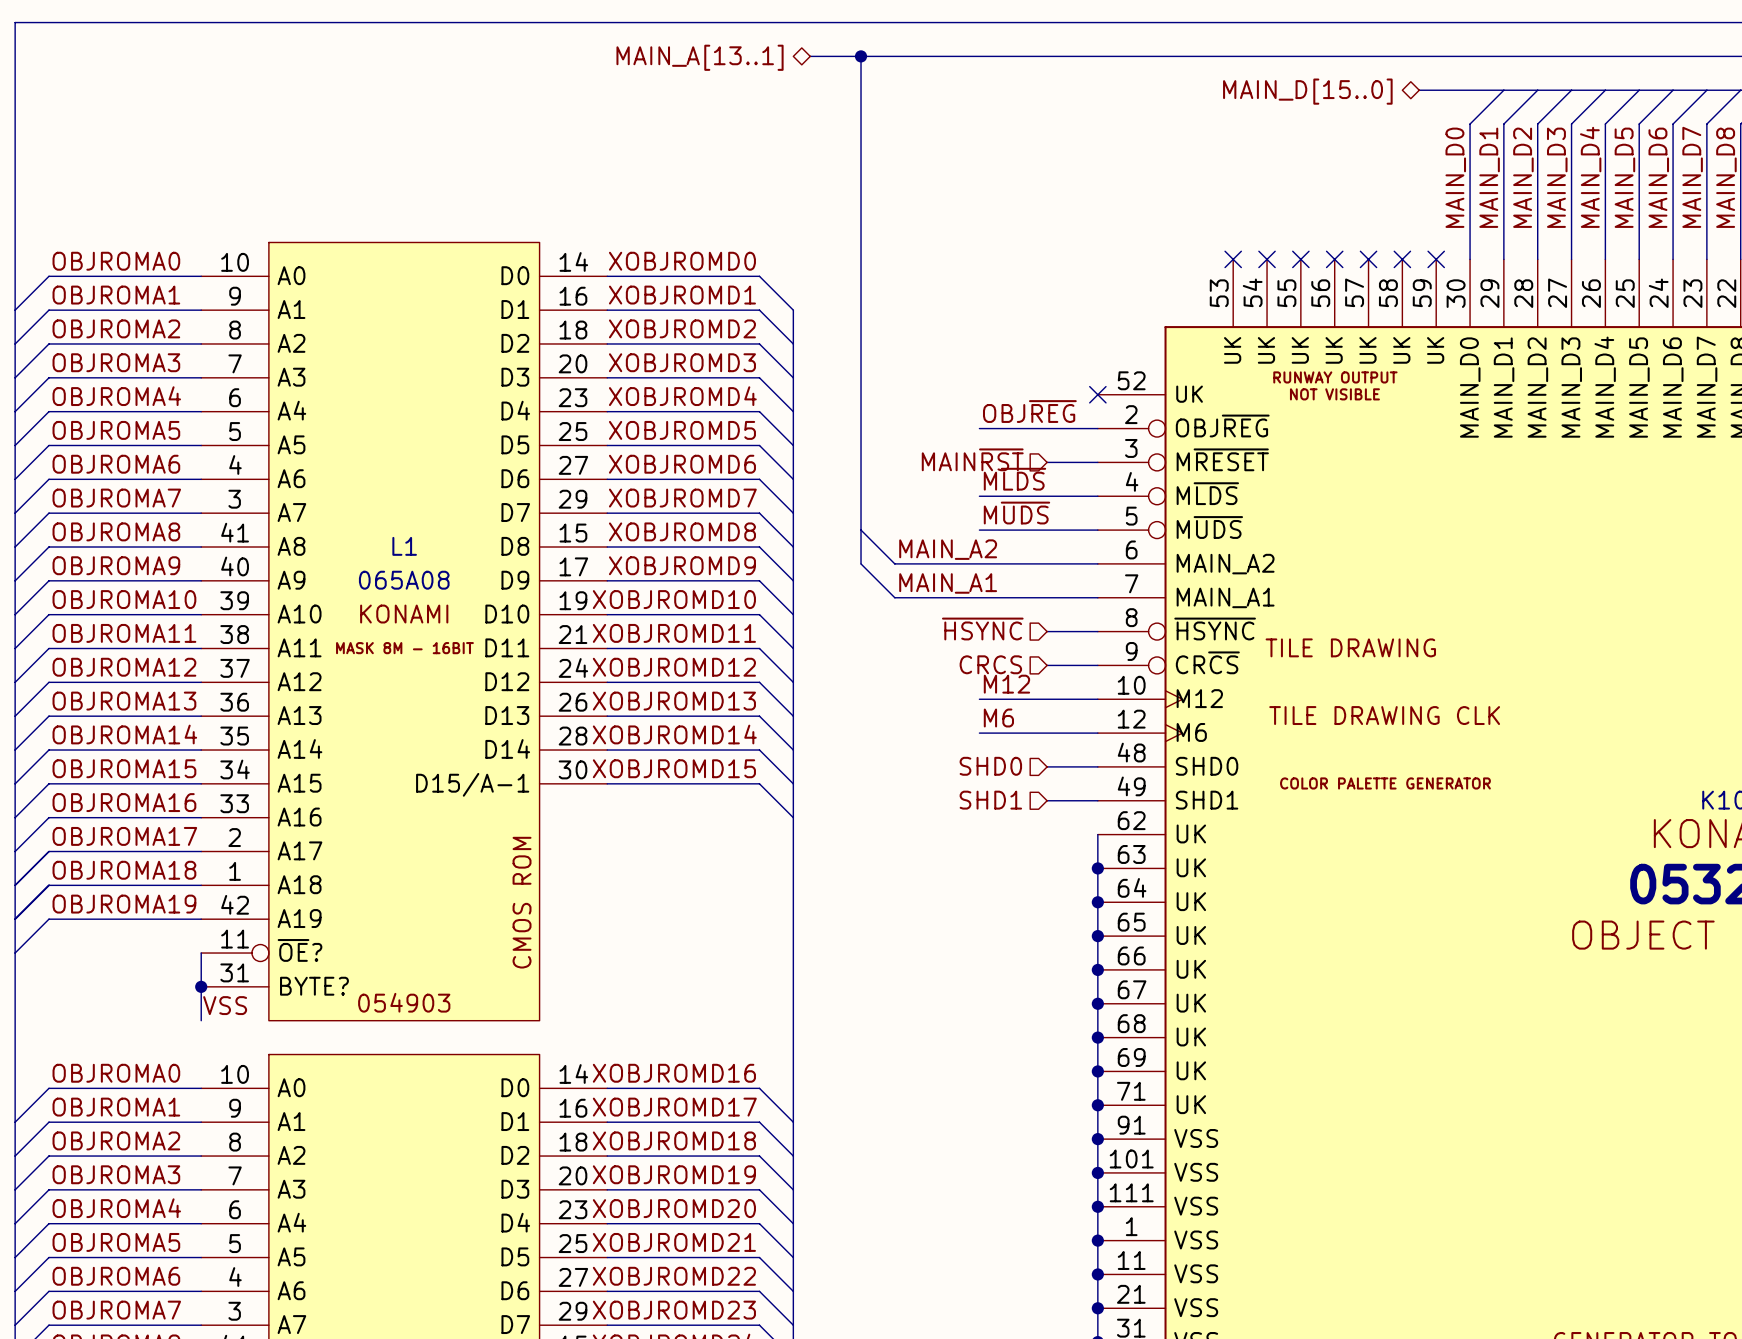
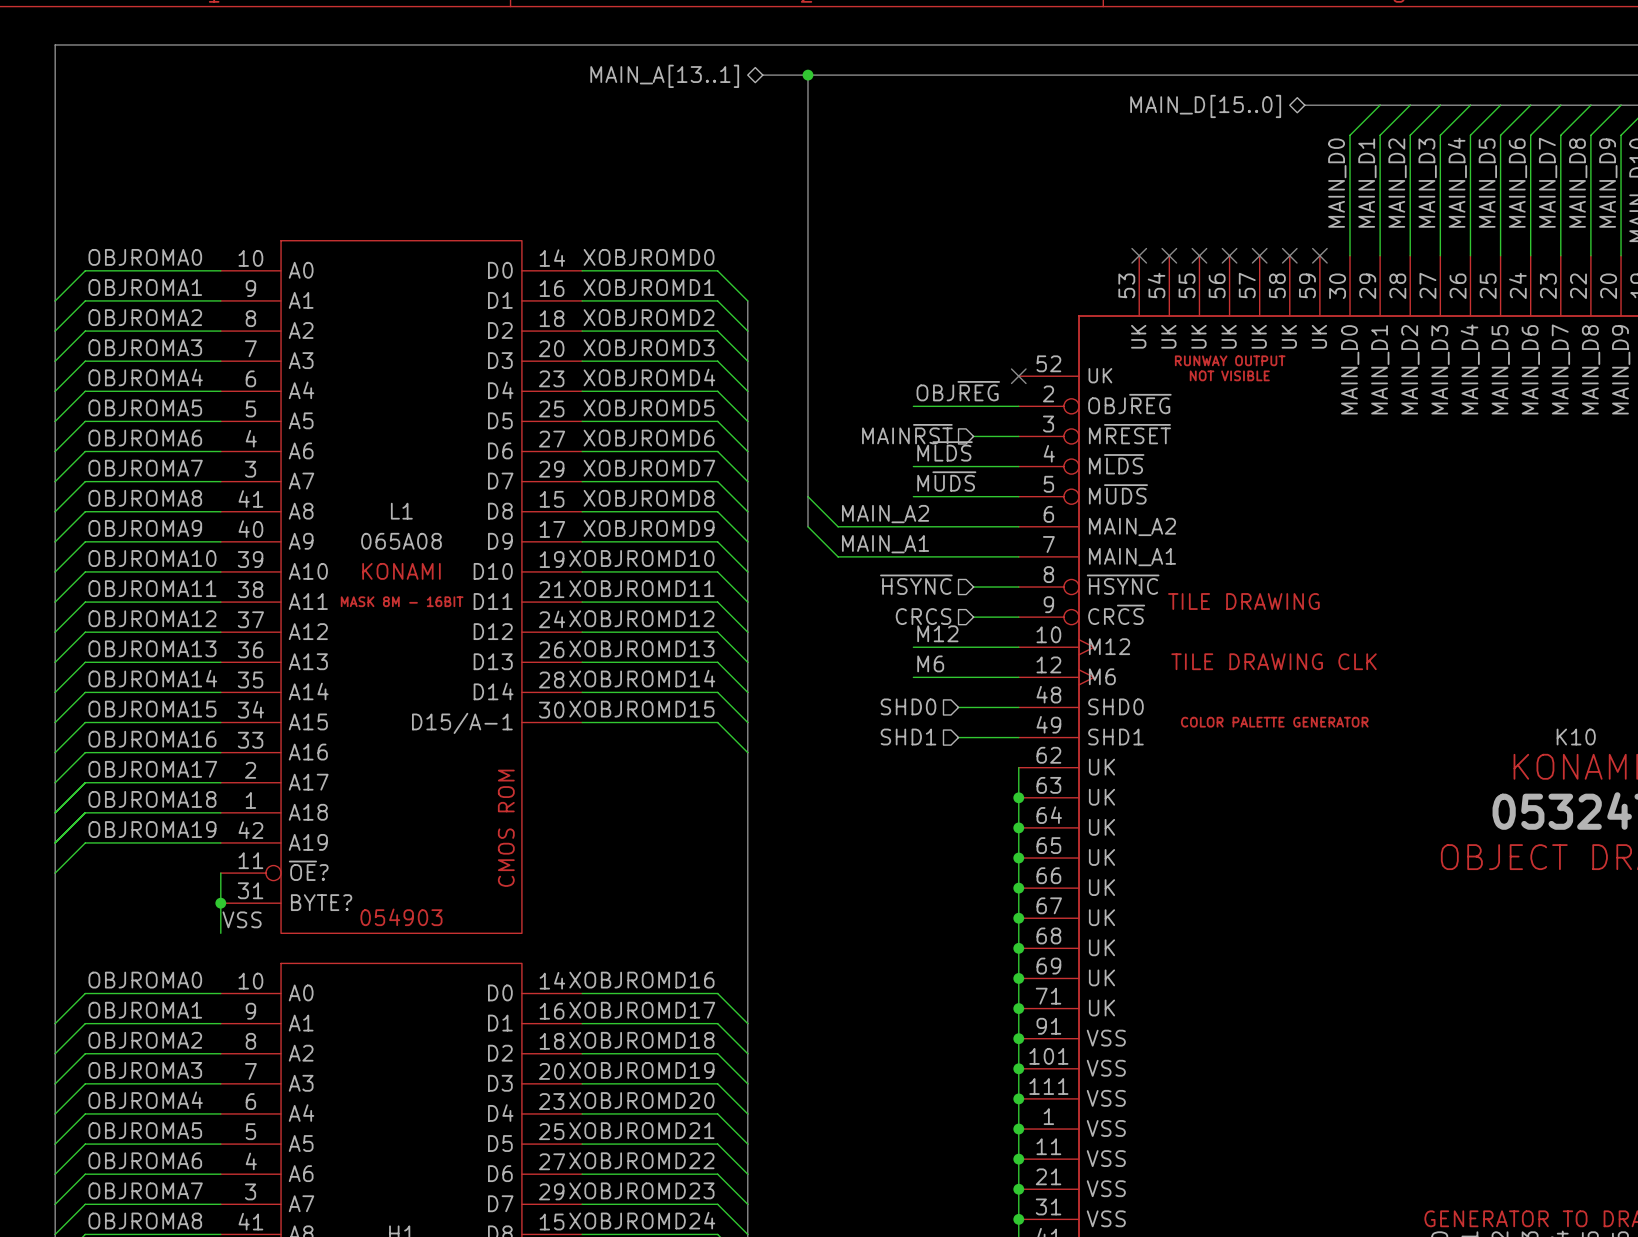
hierarchical label position: SHD0 (990, 766) -> SHD0 (908, 706)
wire: none -> (958, 707) (973, 707)
hierarchical label position: SHD1 (990, 800) -> SHD1 (908, 737)
wire: none -> (958, 737) (973, 737)

